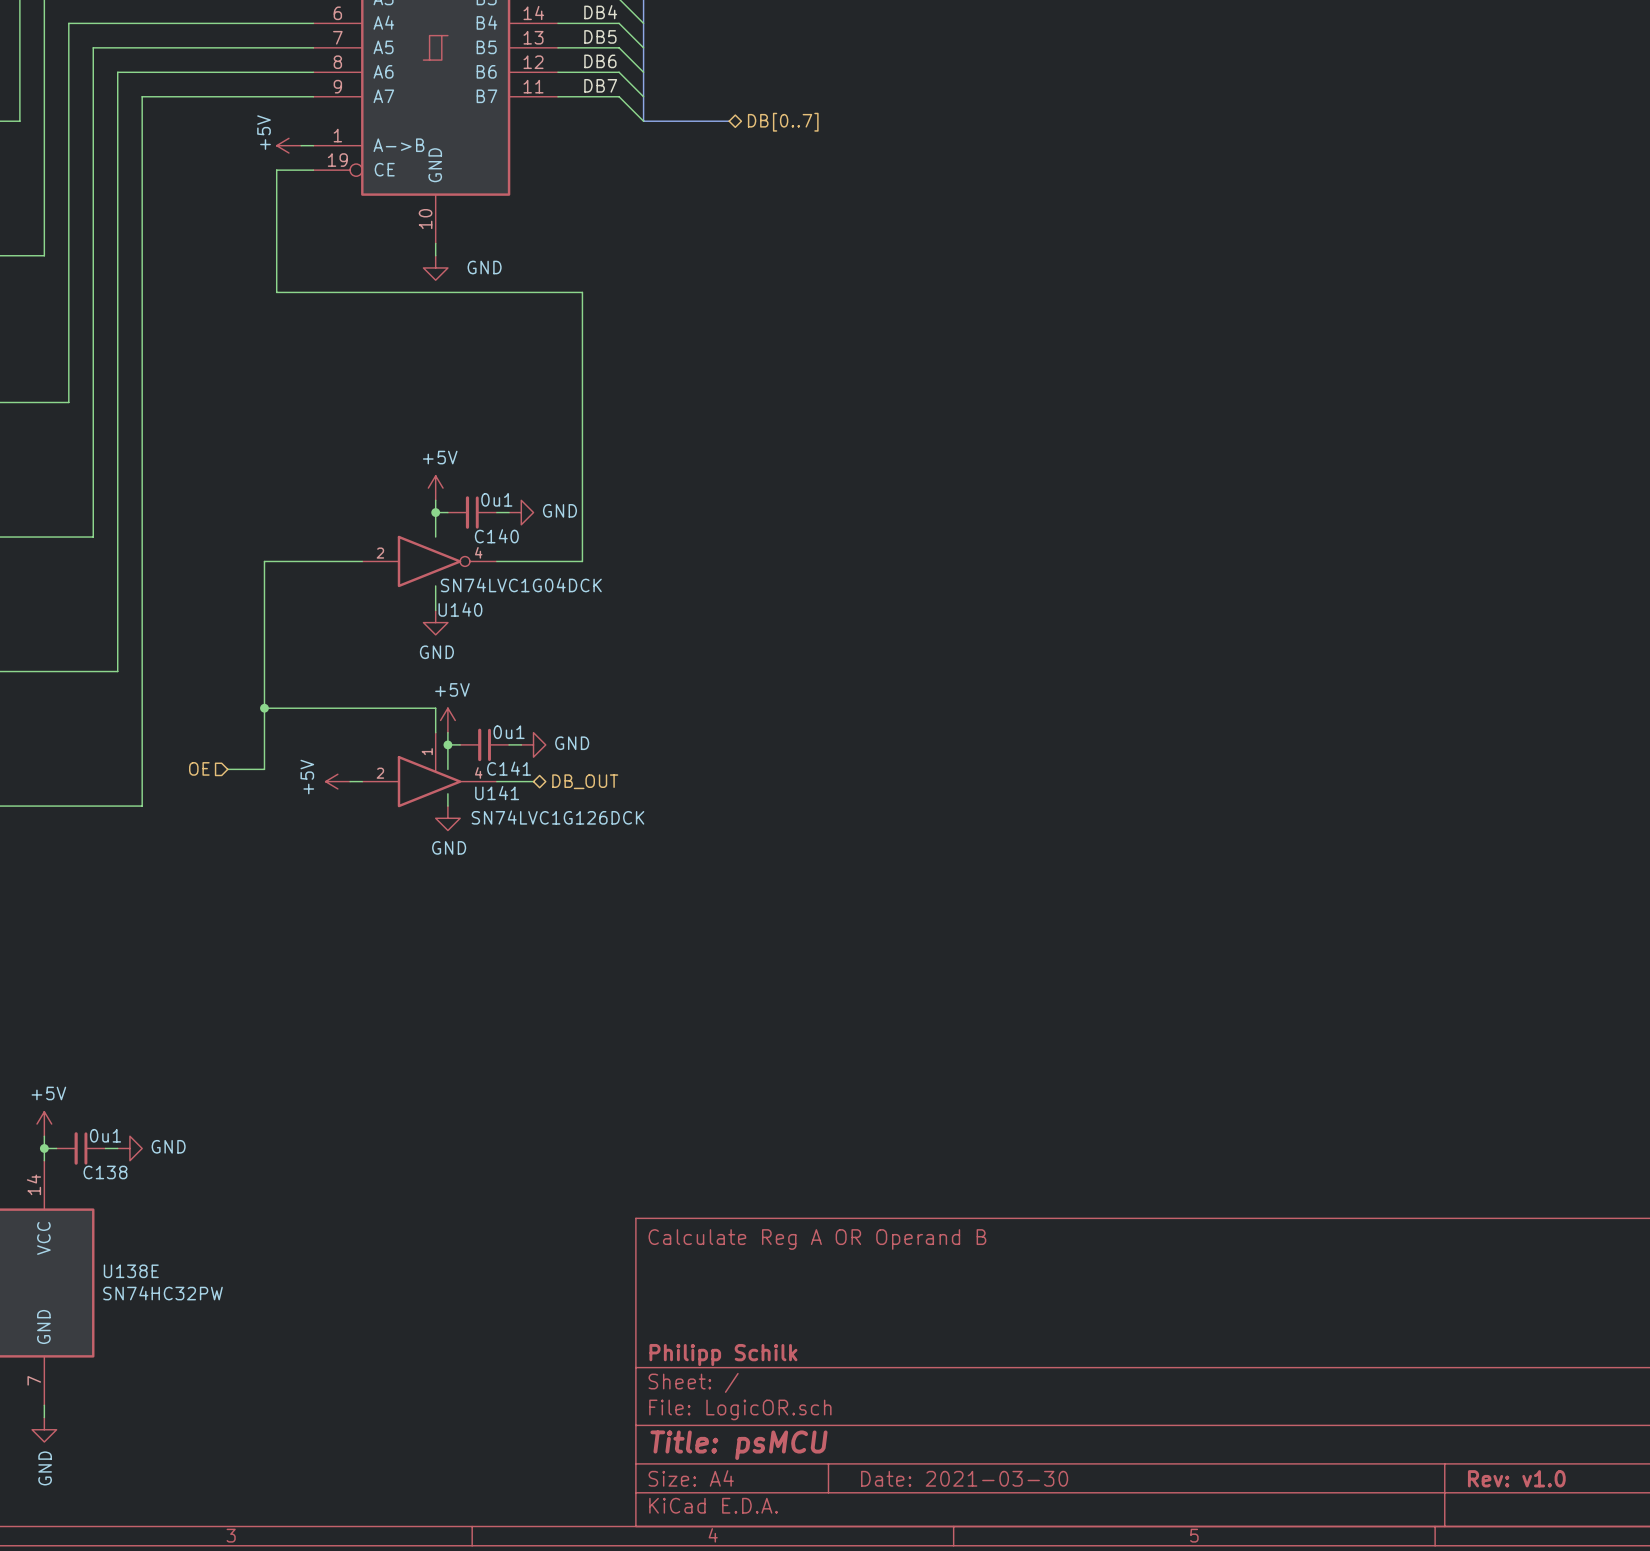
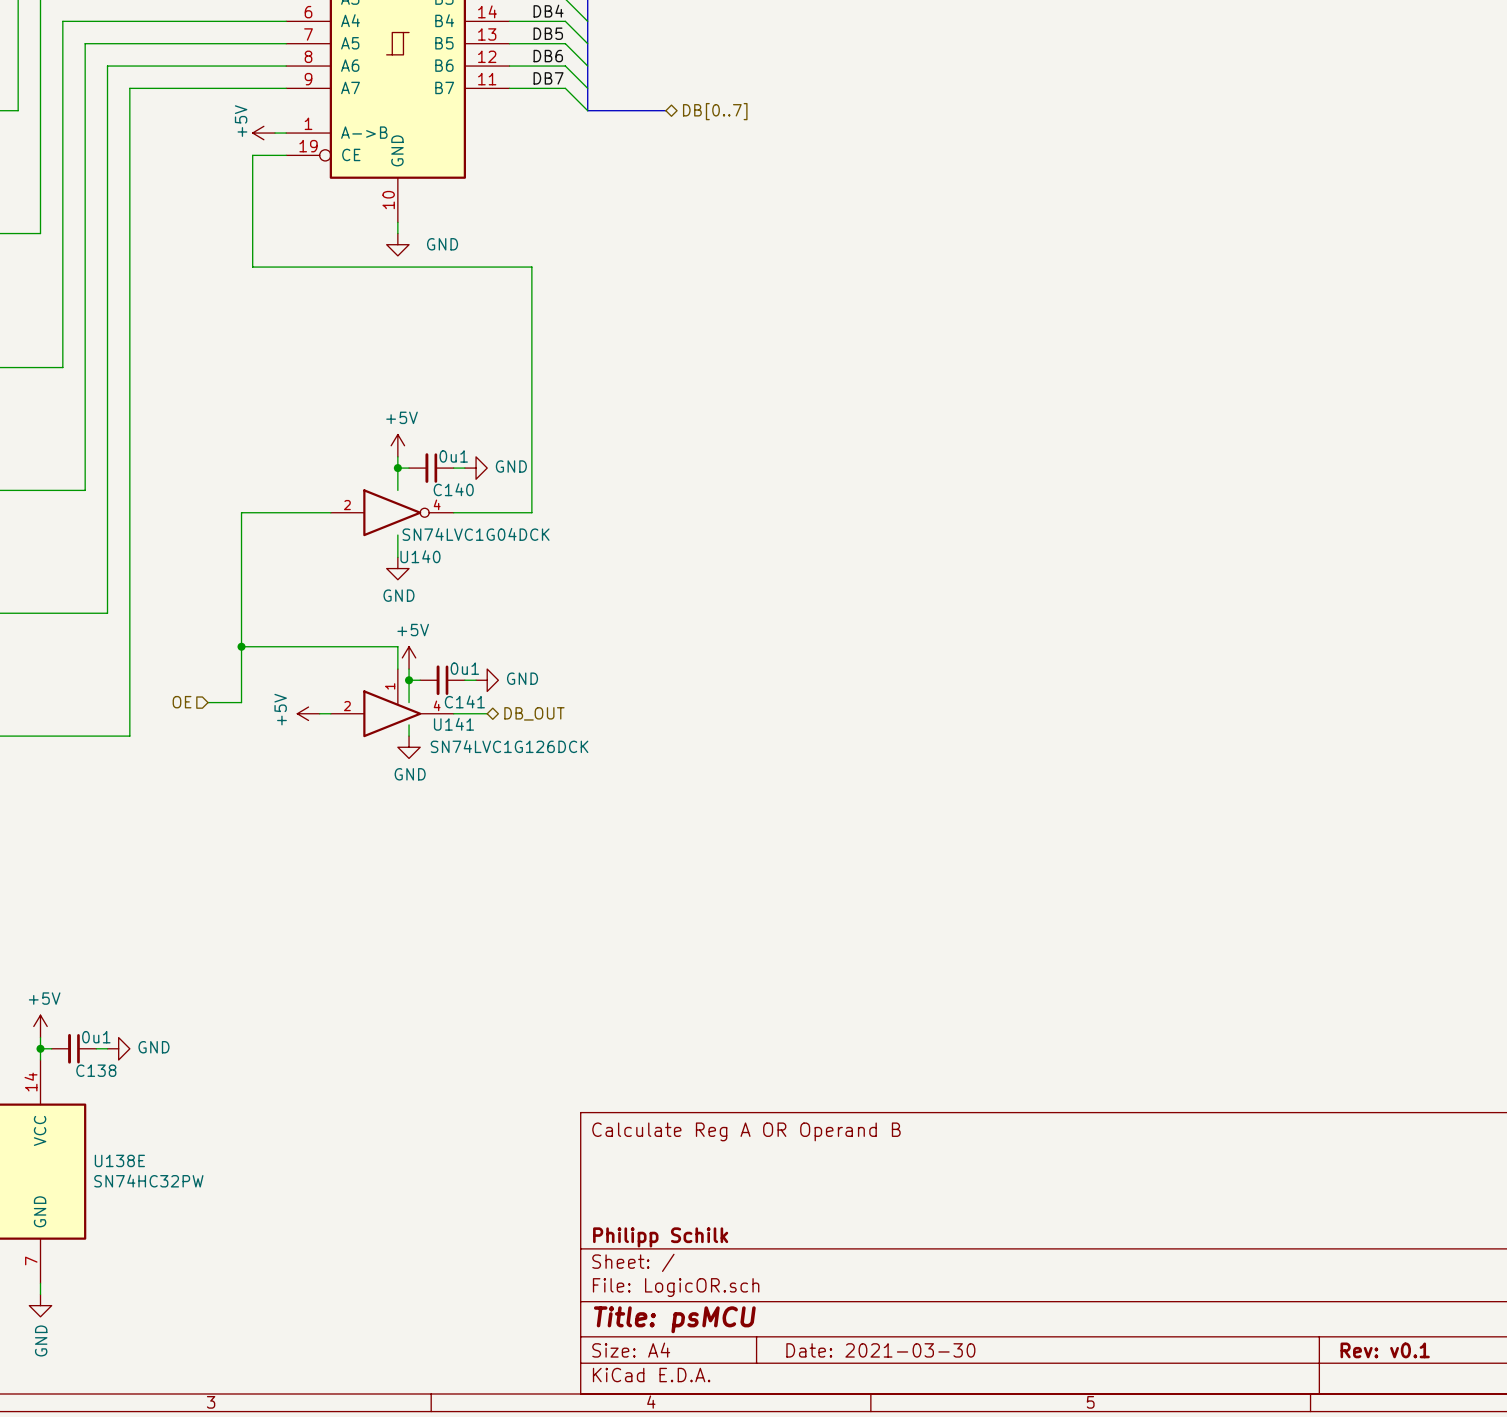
title block: Rev: v1.0 (1516, 1478) -> Rev: v0.1 (1385, 1350)

